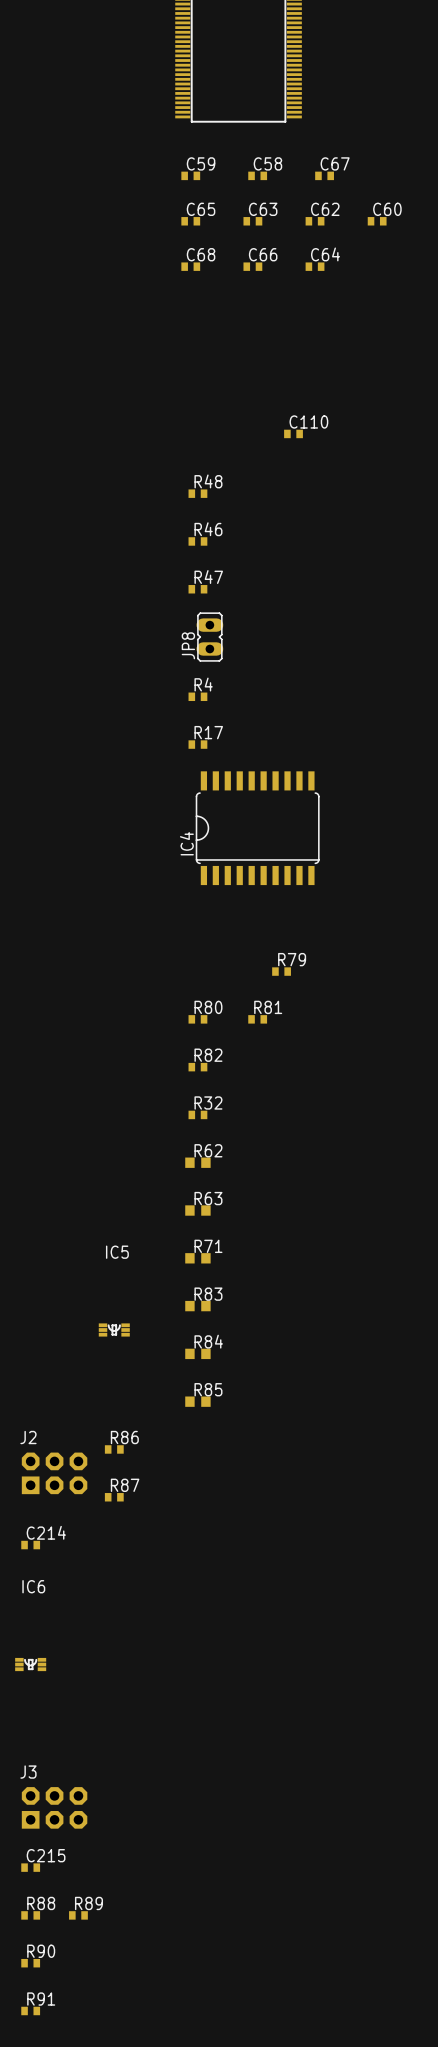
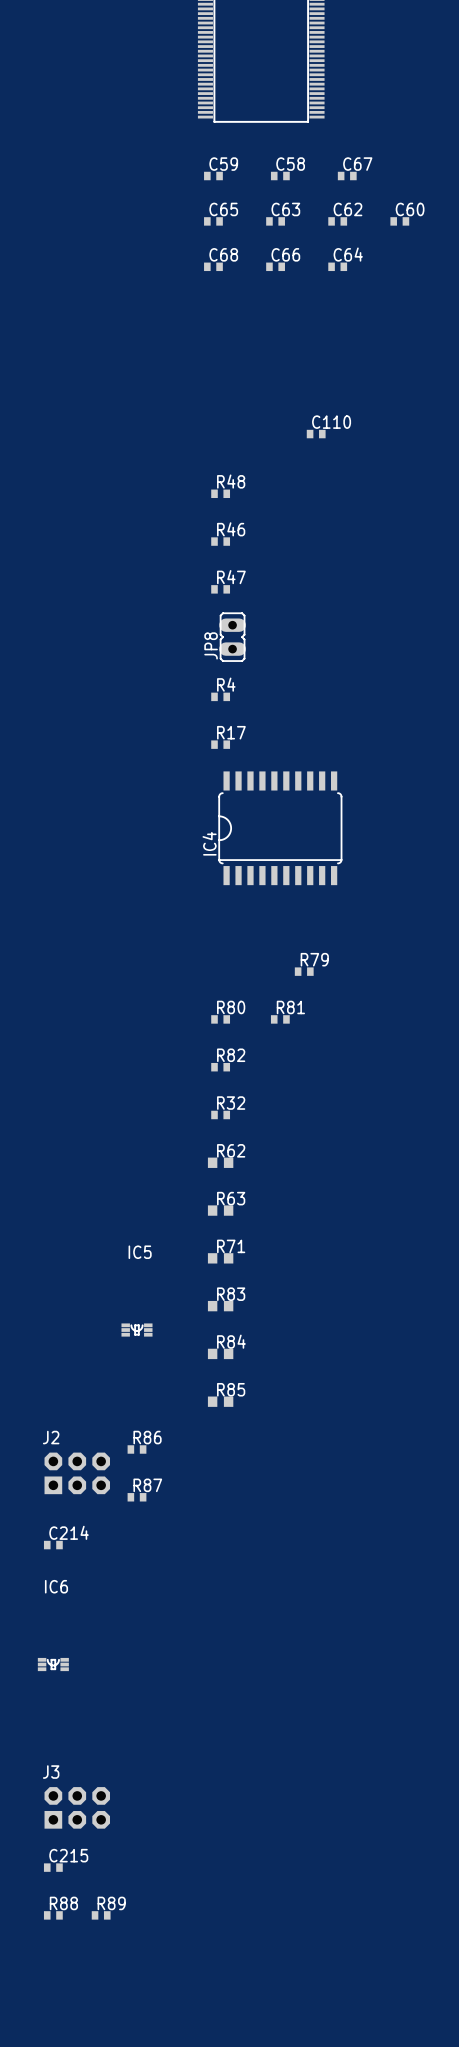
R90: (30, 1963) -> none
R91: (30, 2010) -> none

